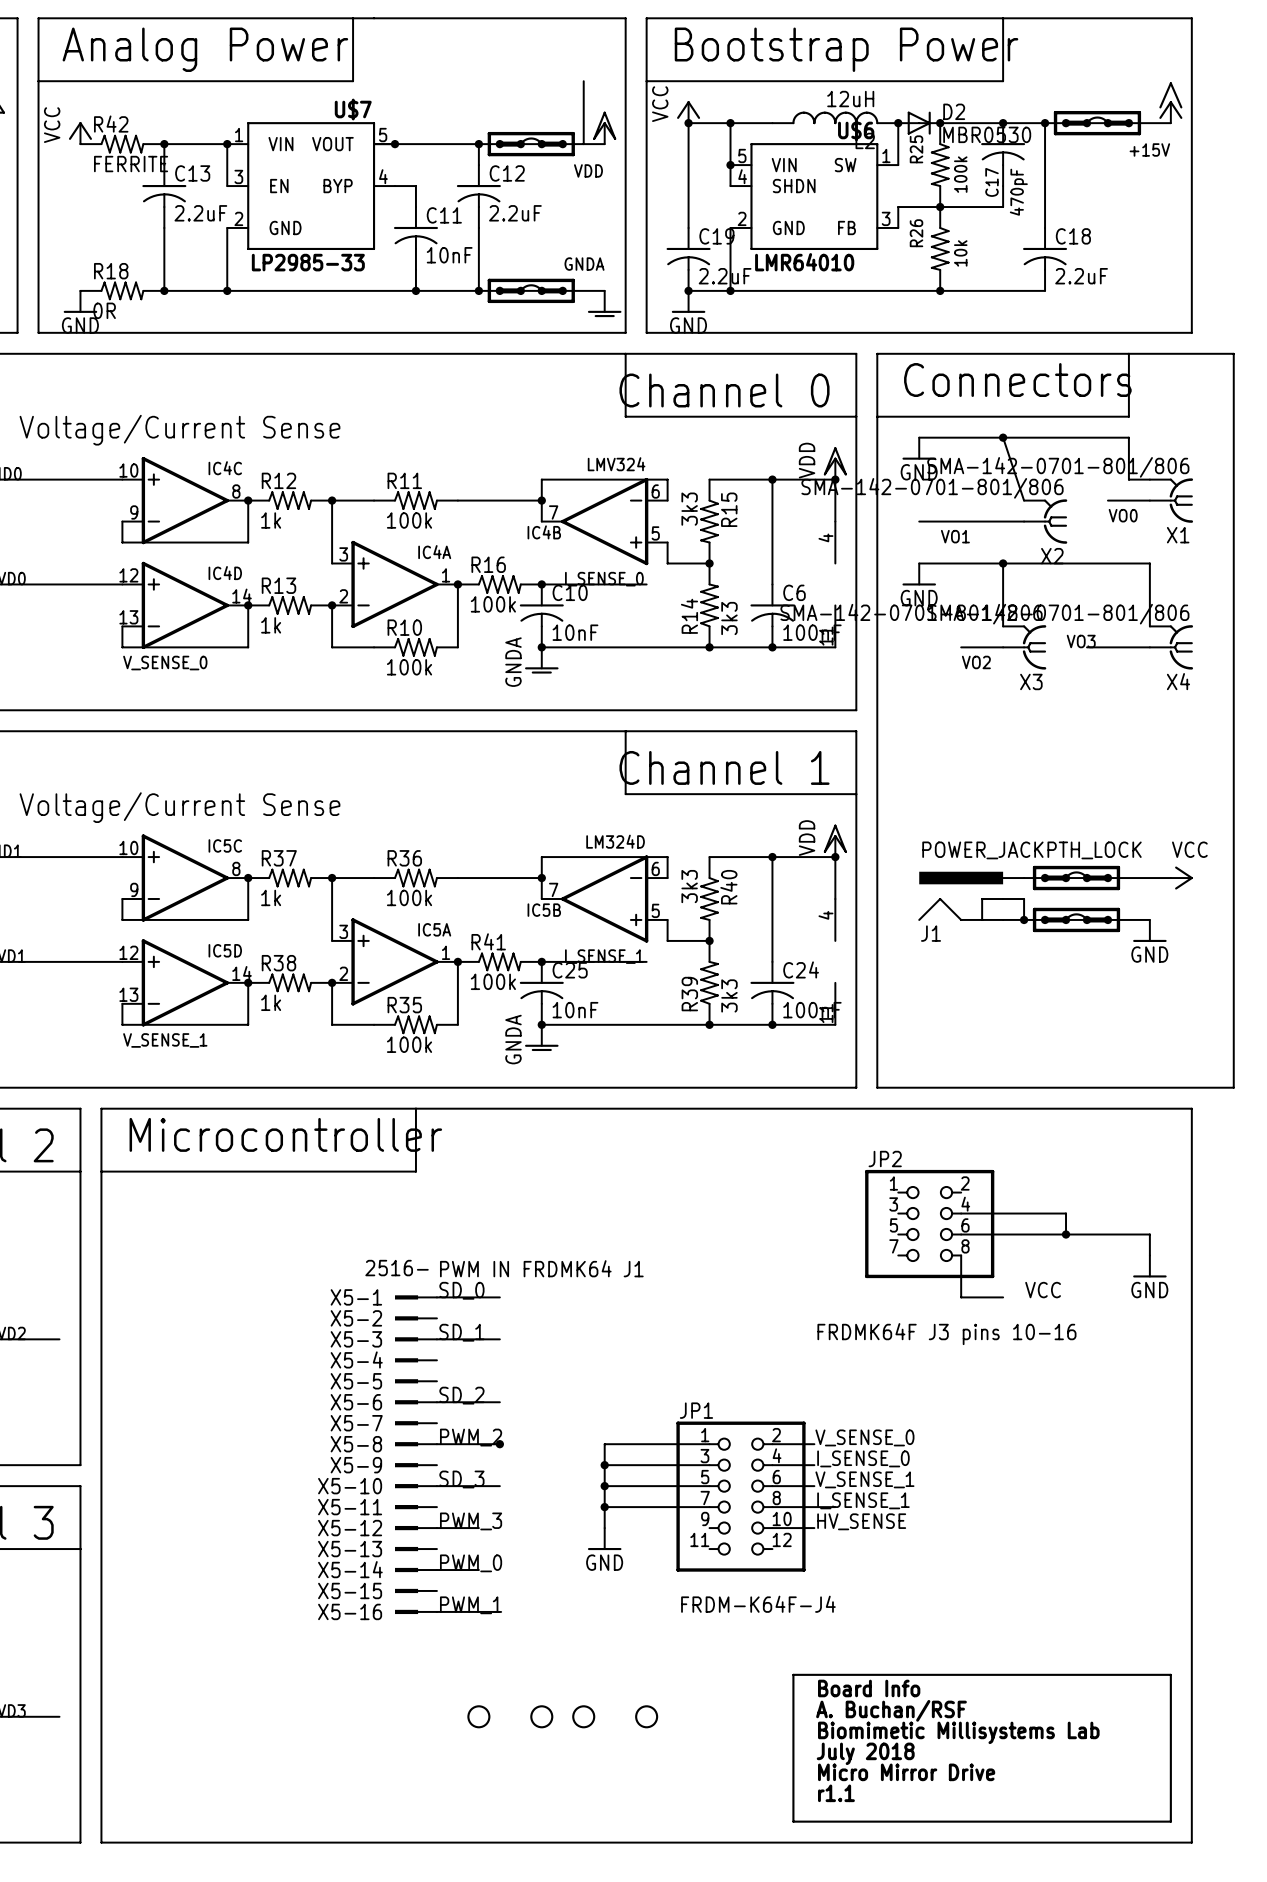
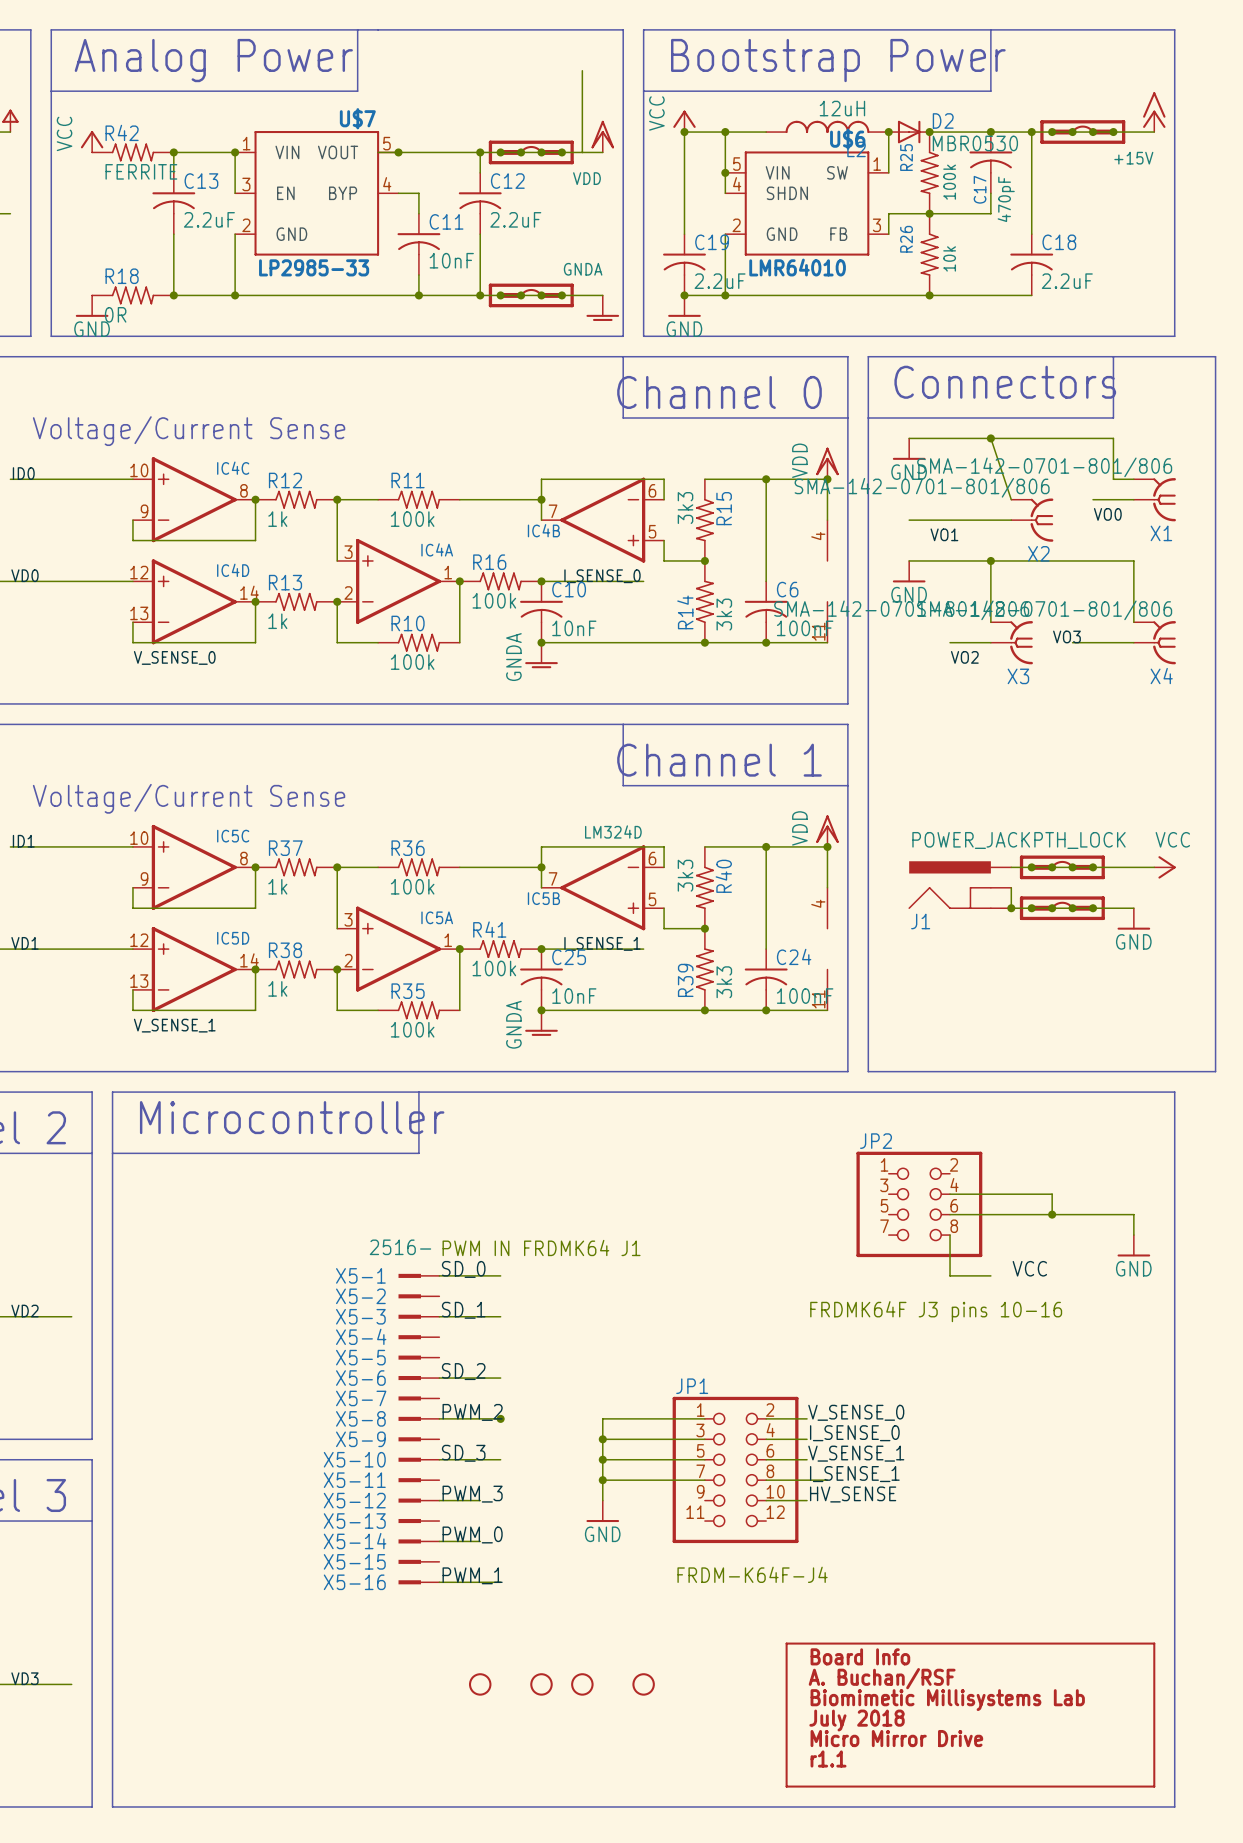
wire: none -> (582, 70) (582, 91)
IC4B value: LMV324 (616, 464) -> none

